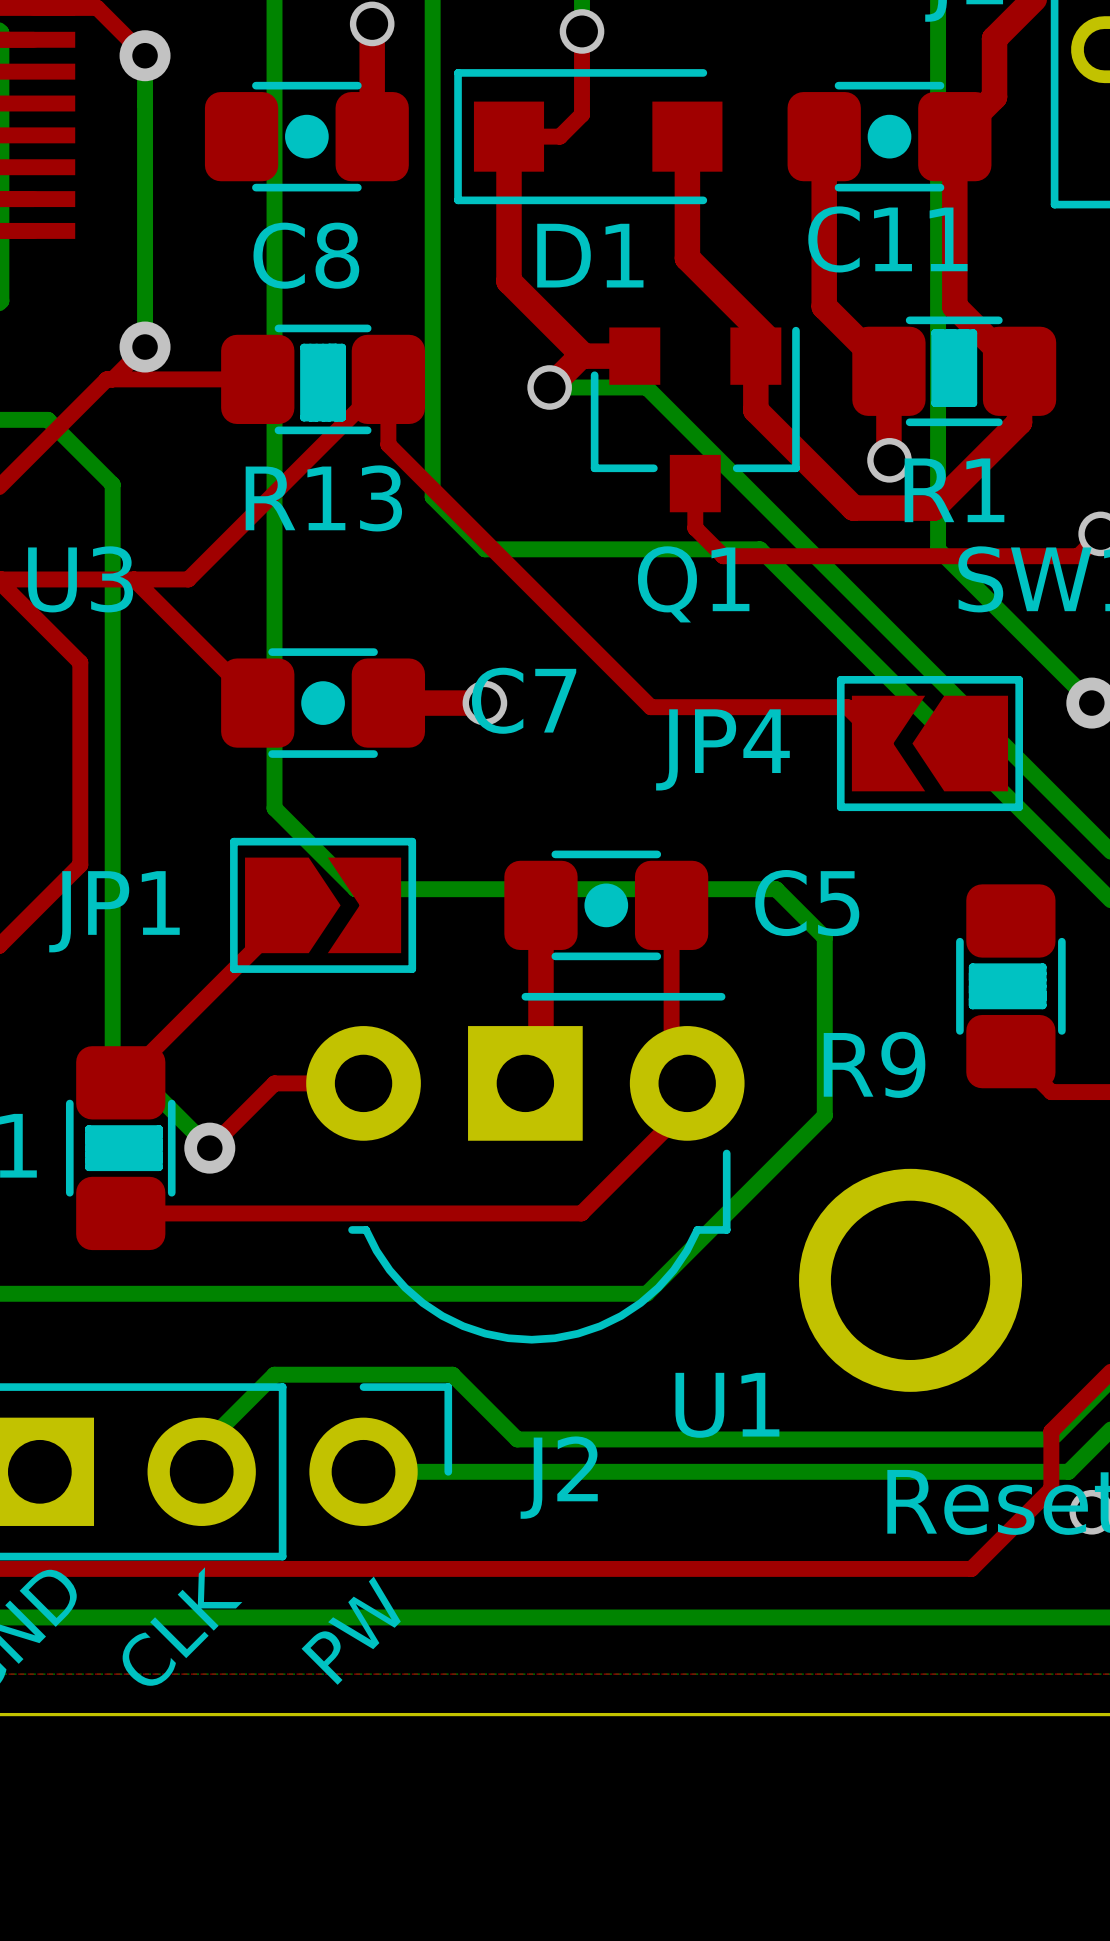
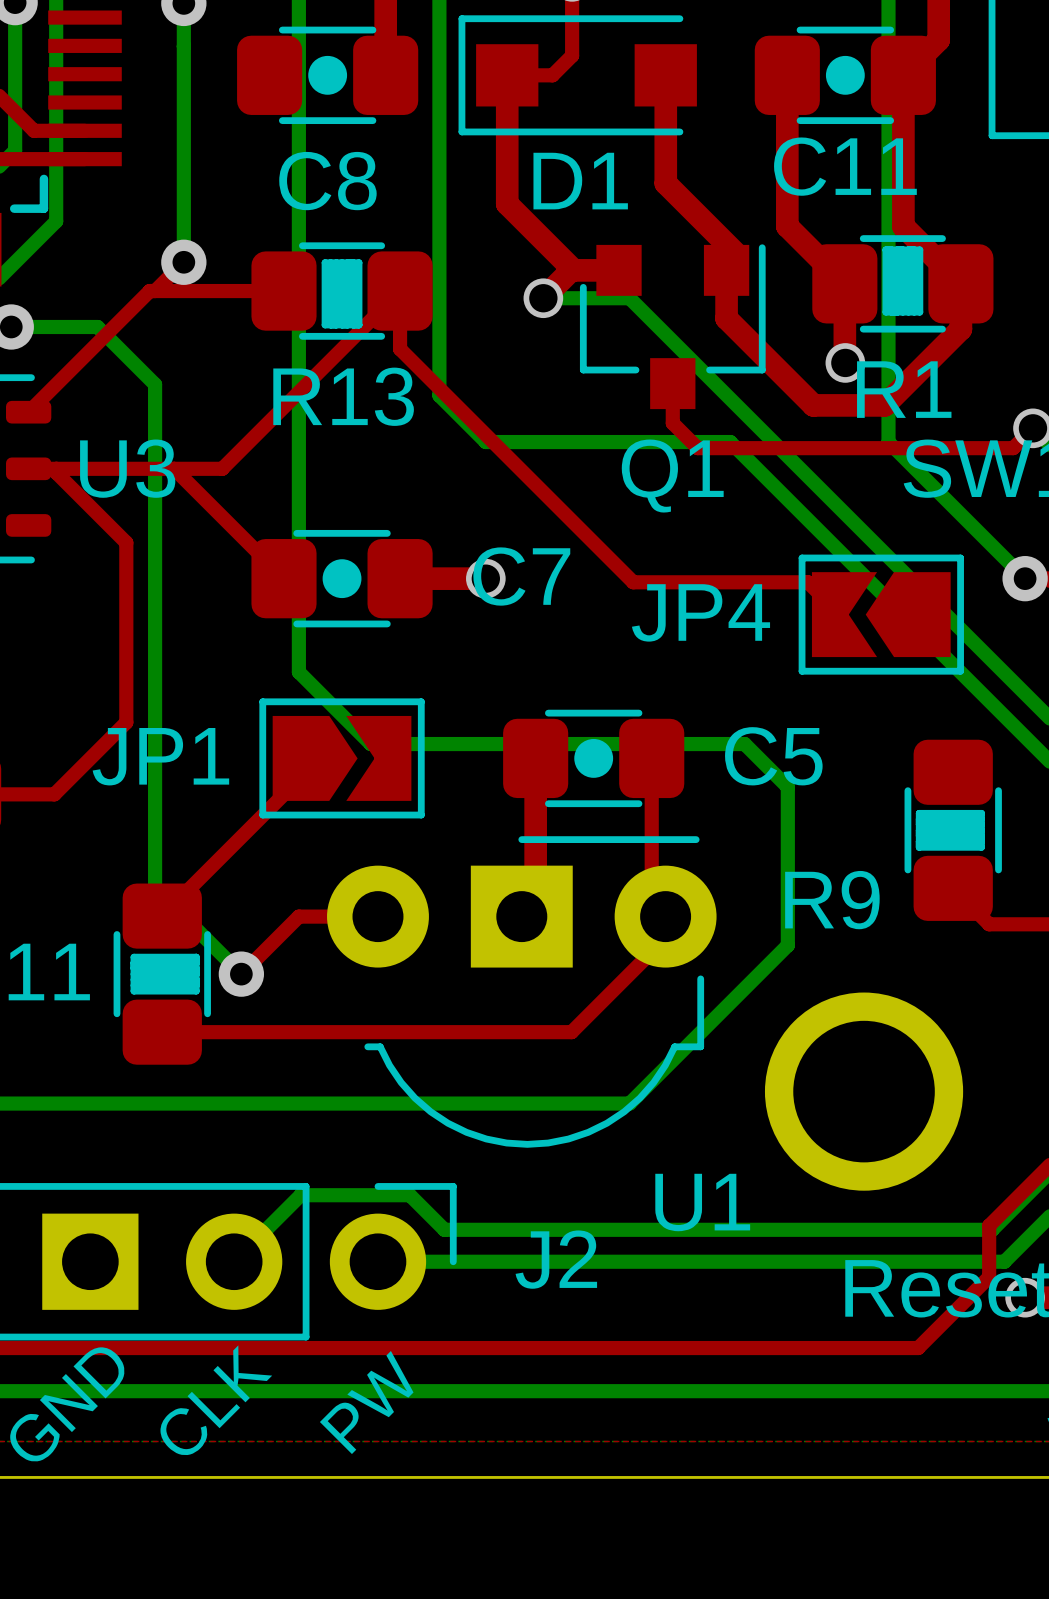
bottom track: (1051, 1439) (517, 1439) (452, 1374) (274, 1374) (201, 1447) (201, 1471) -> (992, 1229) (444, 1229) (409, 1195) (300, 1195) (234, 1261)

